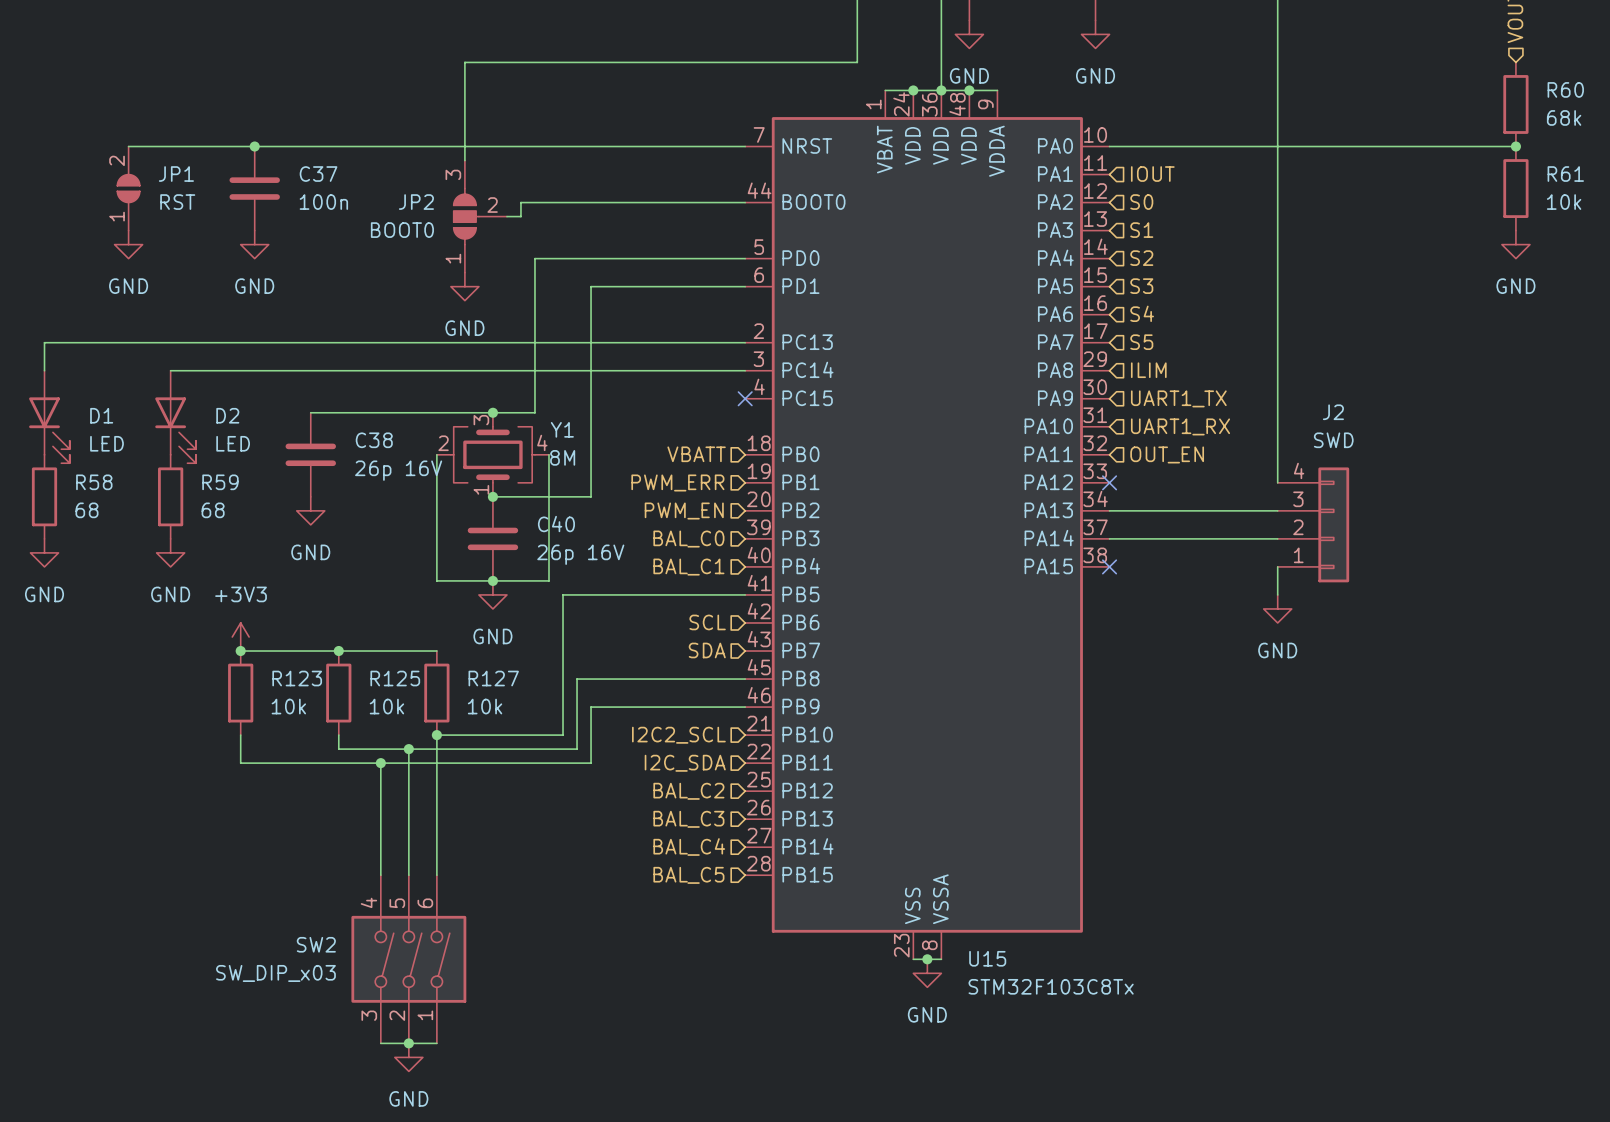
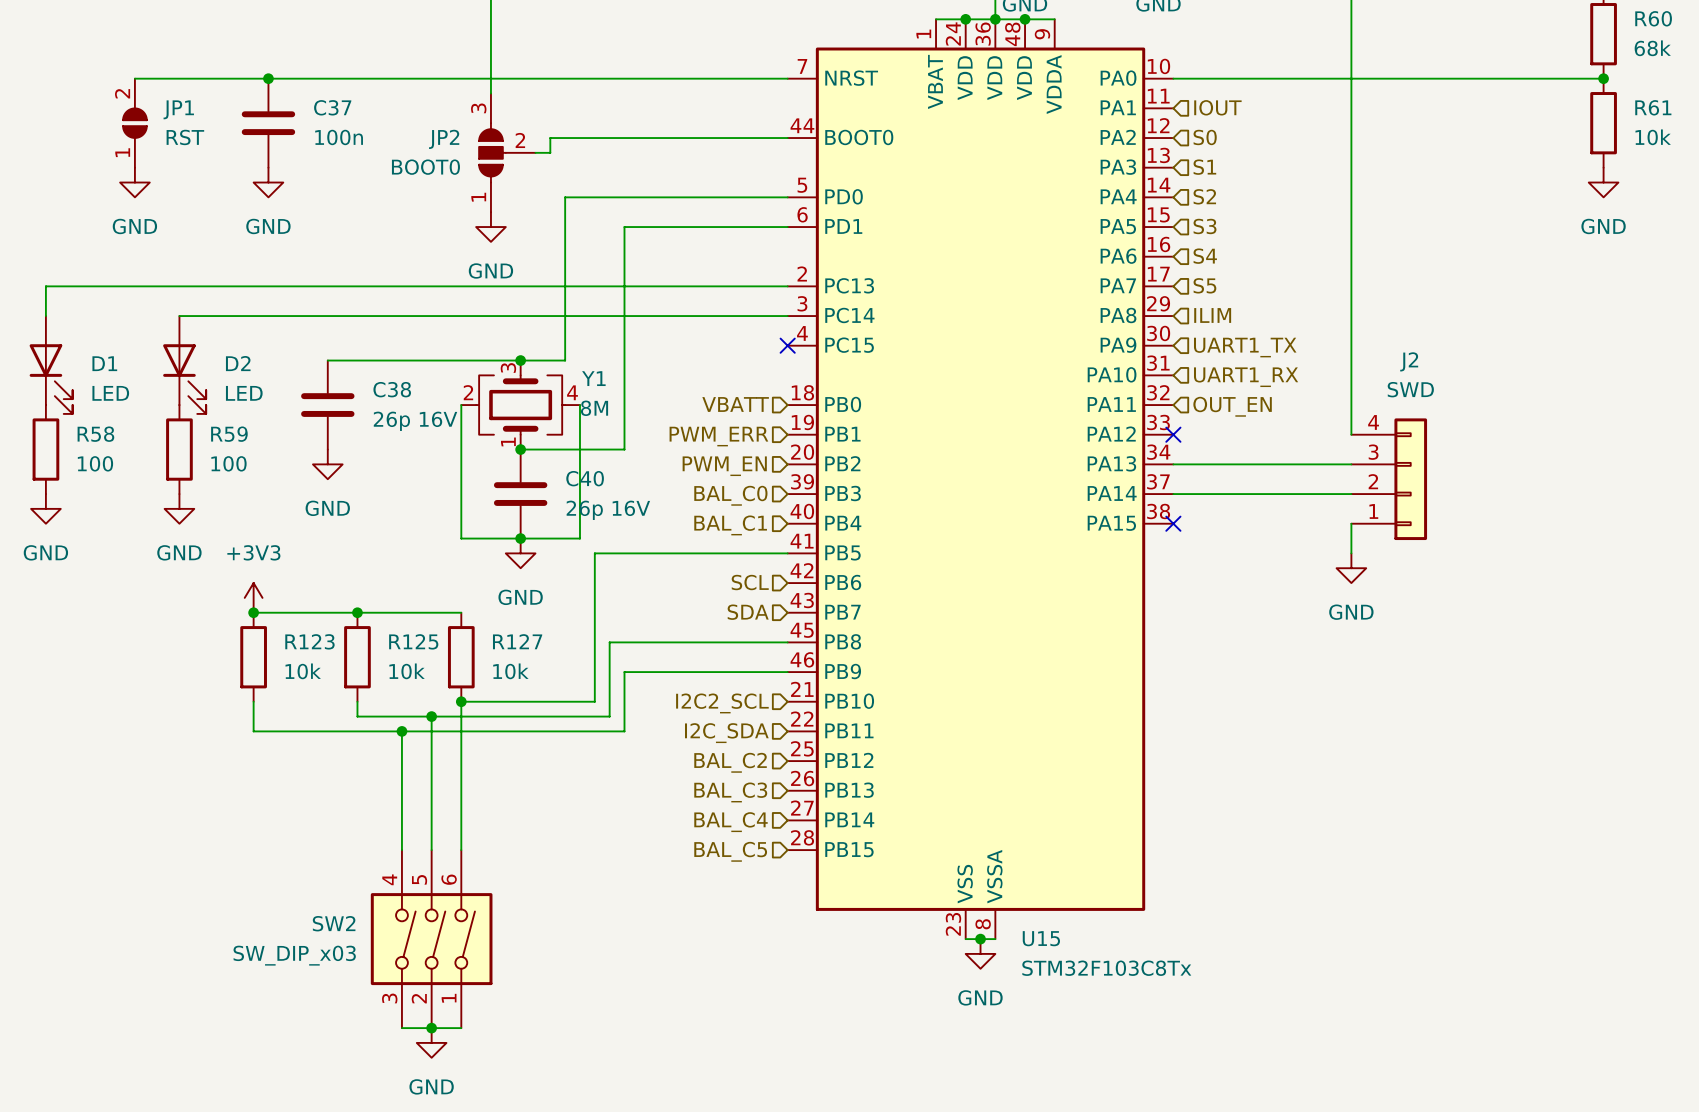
R58 value: 68 (86, 510) -> 100 (95, 463)
R59 value: 68 (213, 510) -> 100 (228, 463)

